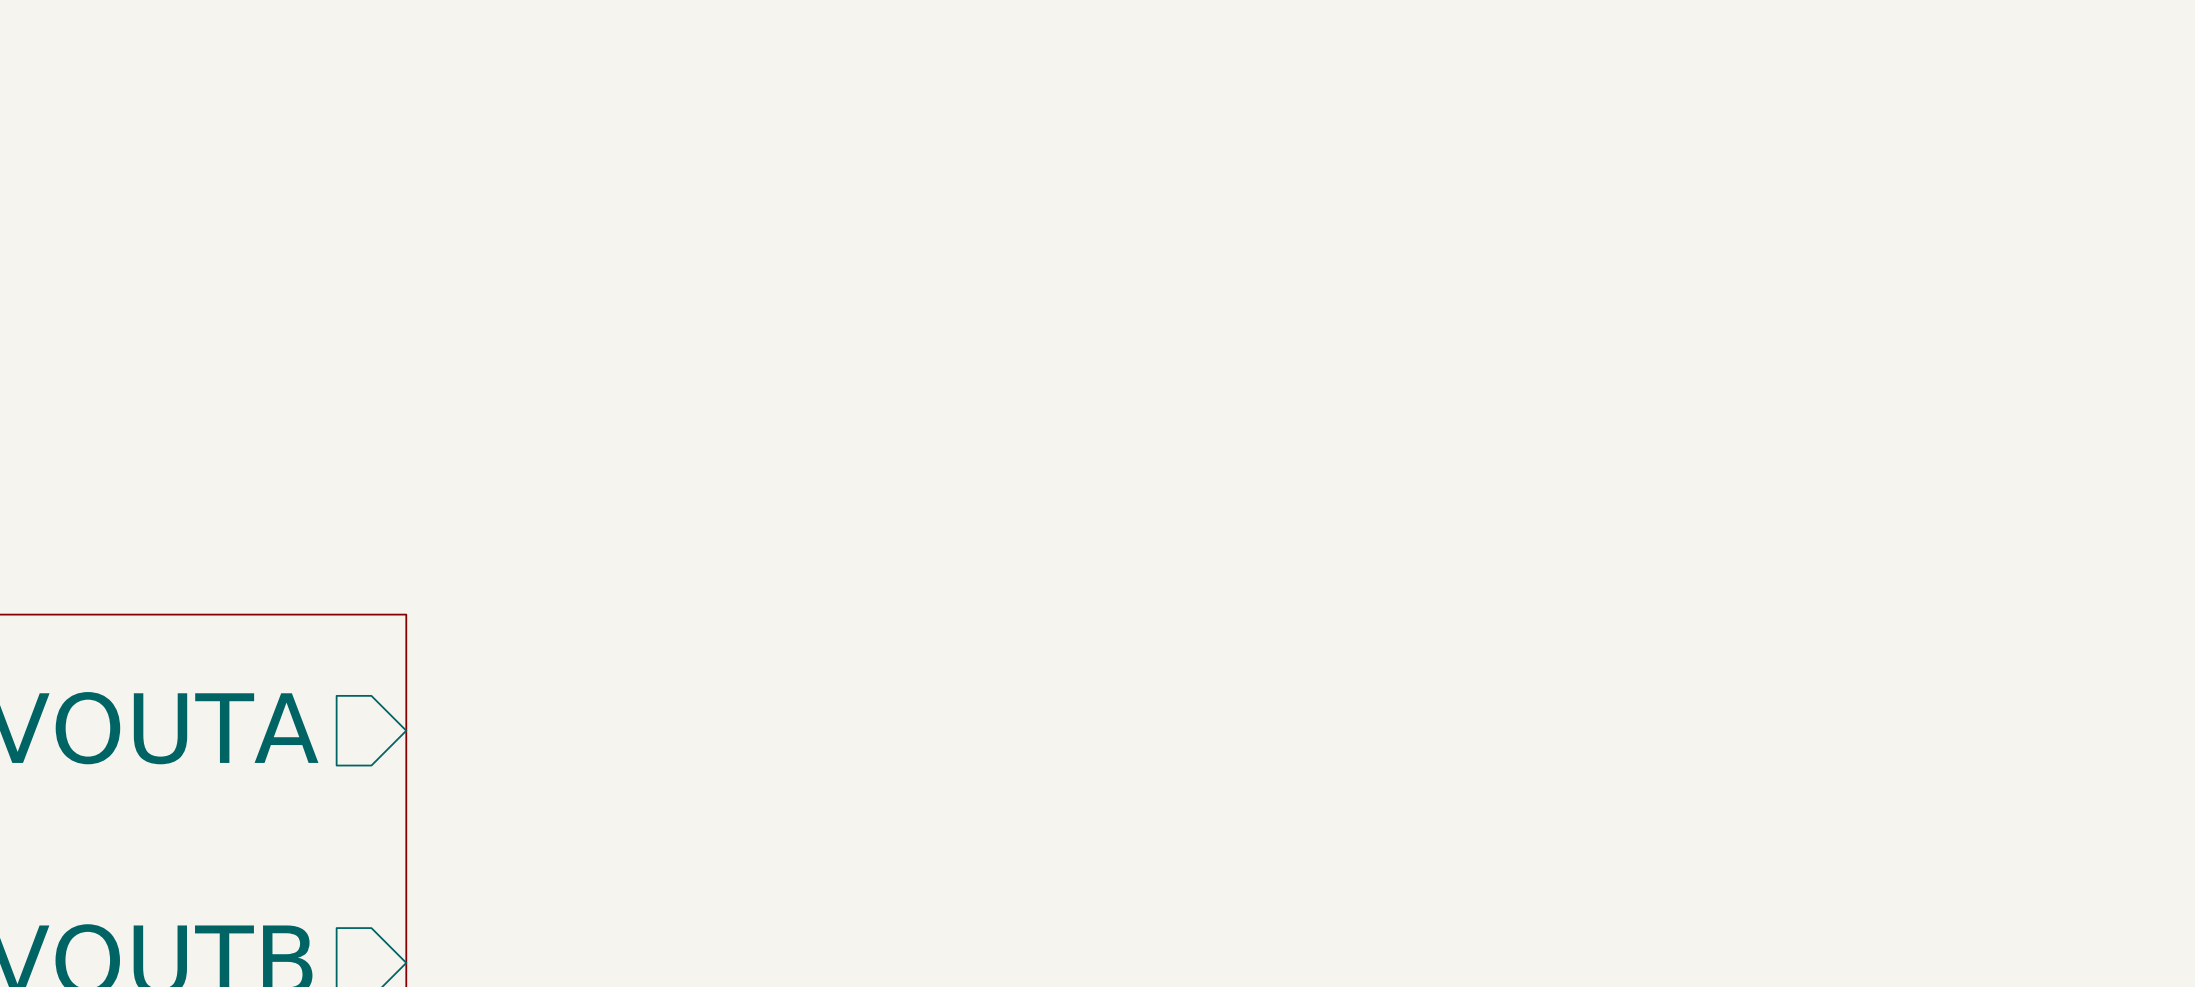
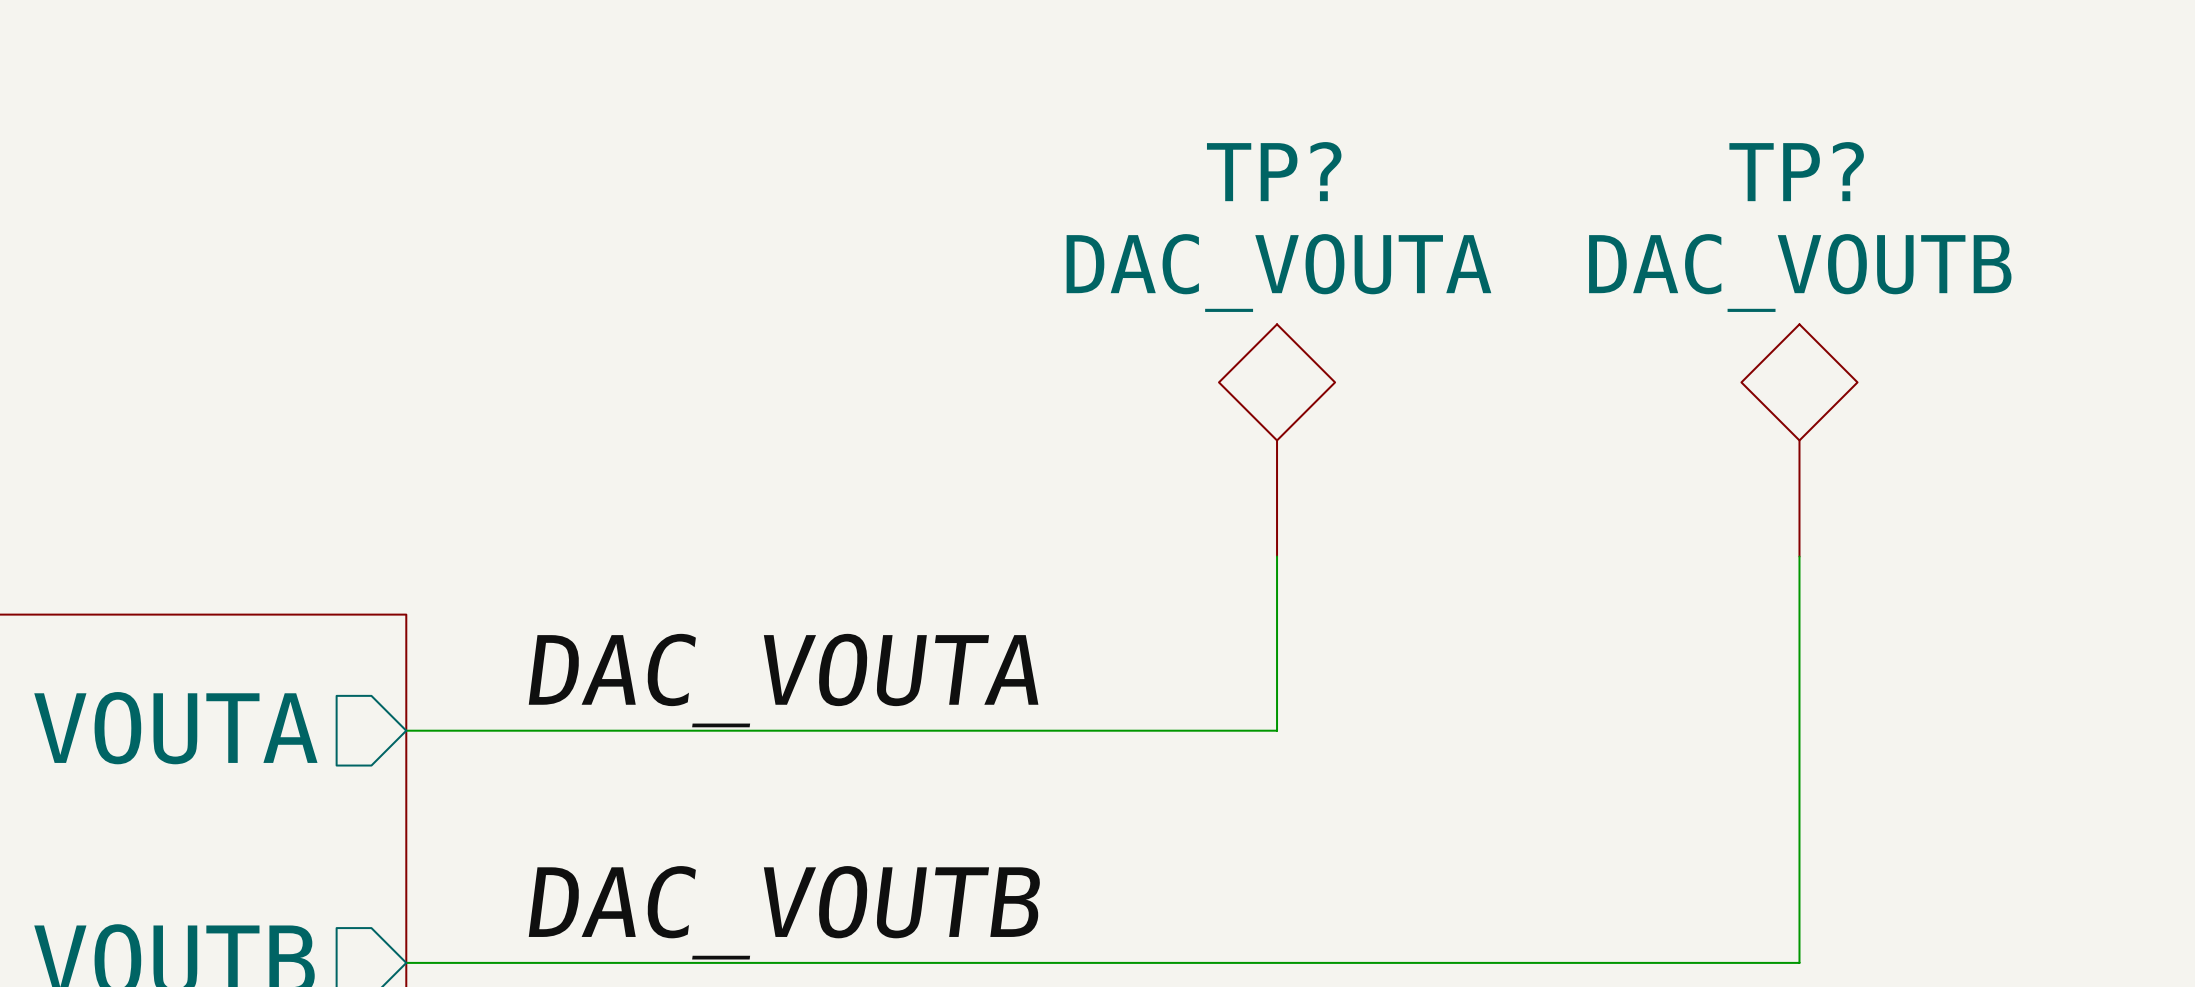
TP?: none -> DAC_VOUTA (1277, 440)
TP?: none -> DAC_VOUTB (1799, 440)
wire: none -> (1277, 556) (1277, 730) (406, 730)
wire: none -> (1799, 556) (1799, 962) (406, 962)
label: none -> DAC_VOUTA (783, 680)
label: none -> DAC_VOUTB (784, 912)

